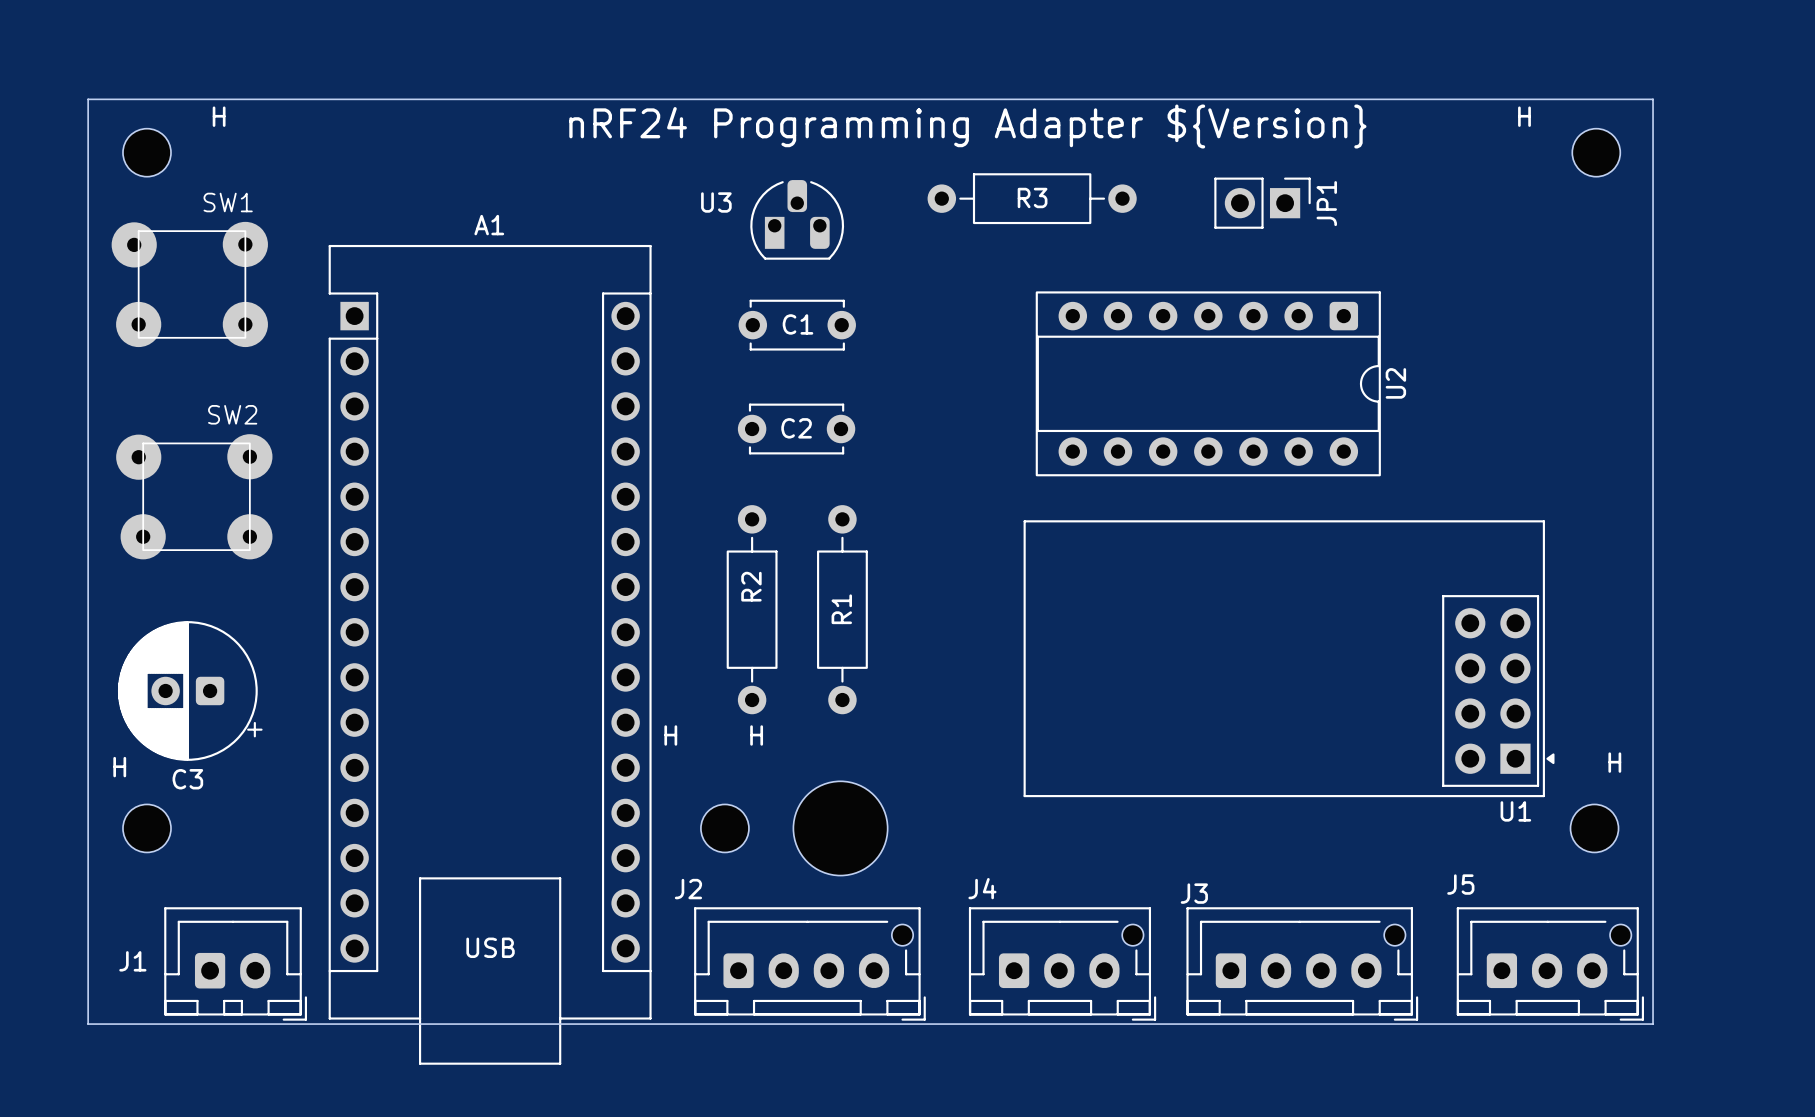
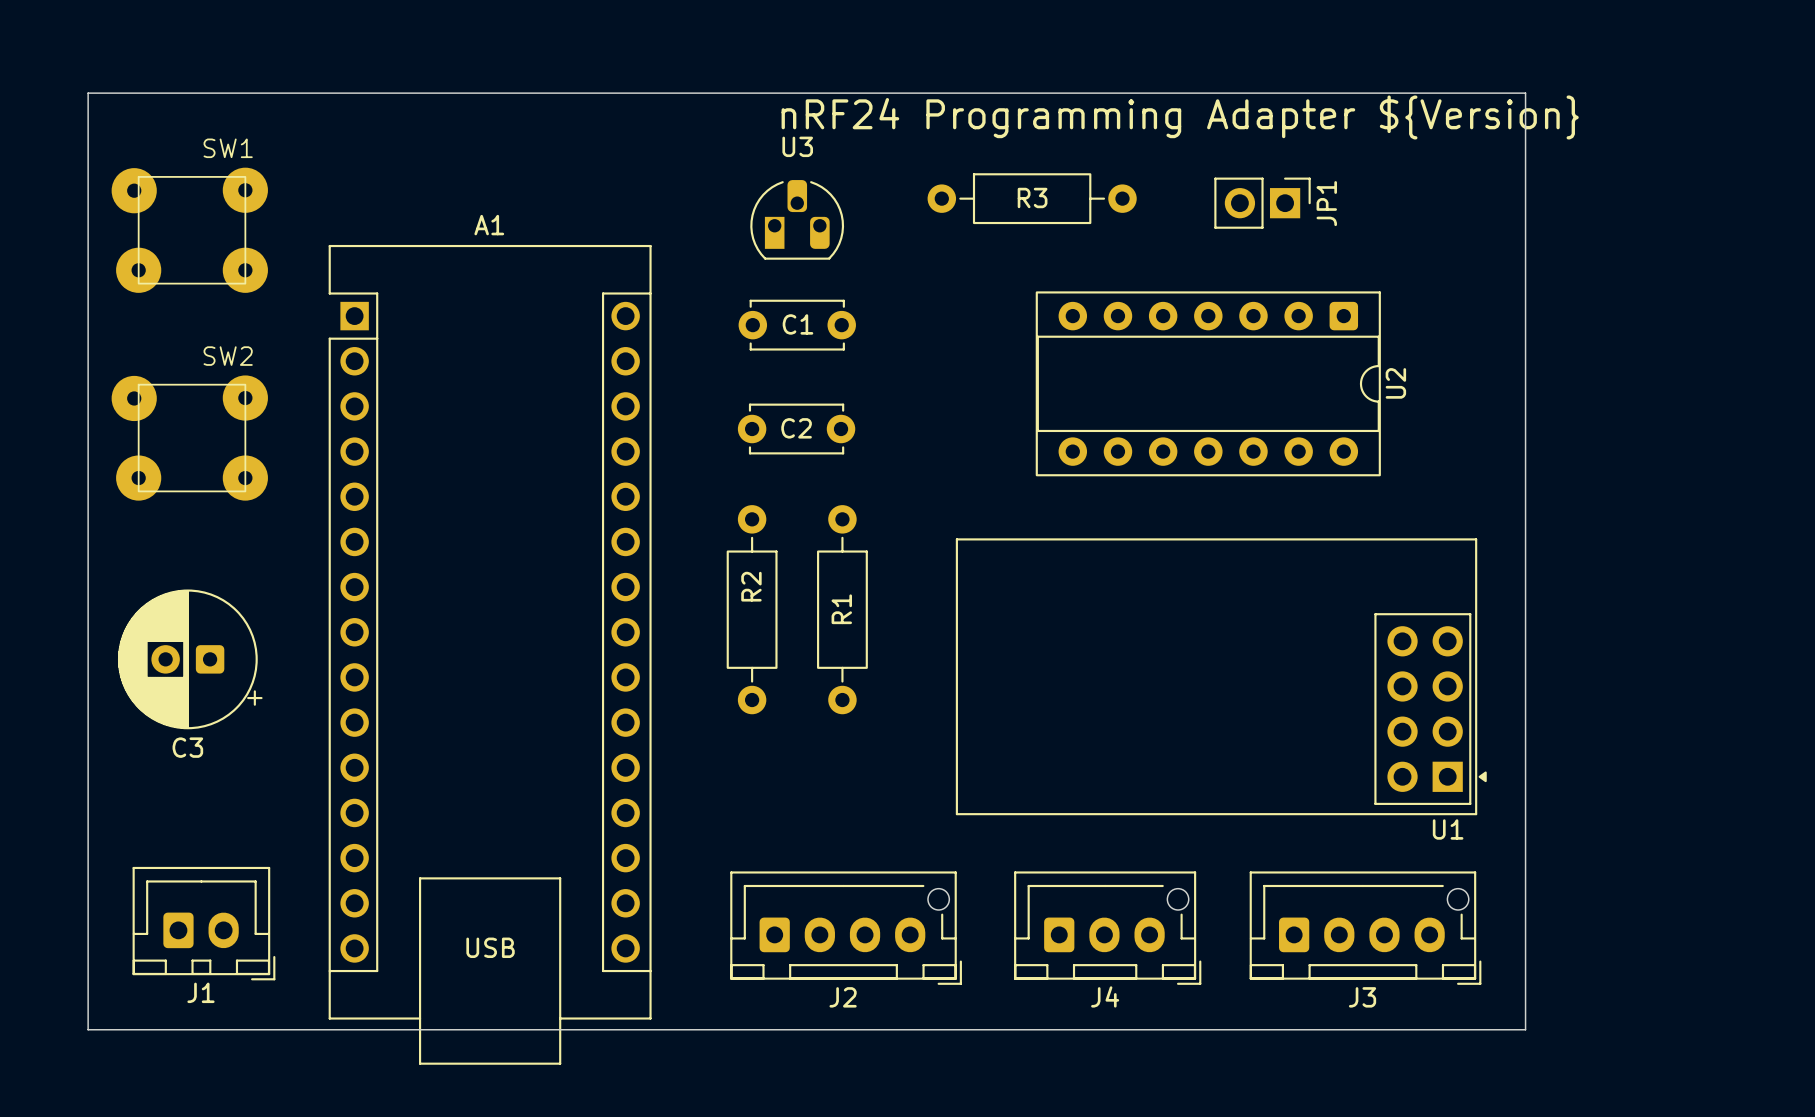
board edge: (88, 99) (1653, 99) (1653, 1024) (88, 1024) -> (88, 99) (88, 93) (1525, 93) (1525, 1029) (88, 1029) (88, 1024)
text position: nRF24 Programming Adapter ${Version} (967, 126) -> nRF24 Programming Adapter ${Version} (1180, 117)
H: (146, 152) -> none
H: (1596, 152) -> none
U3 name position: U3 (716, 202) -> U3 (797, 146)
SW1 position: (189, 284) -> (189, 230)
SW2 position: (194, 496) -> (189, 438)
U1 position: (1289, 658) -> (1221, 676)
C3 position: (190, 690) -> (190, 659)
H: (146, 828) -> none
H: (724, 828) -> none
H: (840, 828) -> none
H: (1594, 828) -> none
J4 name position: J4 (982, 888) -> J4 (1105, 996)
J2 name position: J2 (688, 889) -> J2 (843, 997)
J3 name position: J3 (1194, 893) -> J3 (1362, 997)
J1 name position: J1 (132, 961) -> J1 (200, 992)
J1 position: (235, 963) -> (203, 923)
J2 position: (809, 963) -> (846, 928)
J4 position: (1062, 963) -> (1107, 928)
J3 position: (1302, 963) -> (1365, 928)
J5: (1550, 963) -> none

